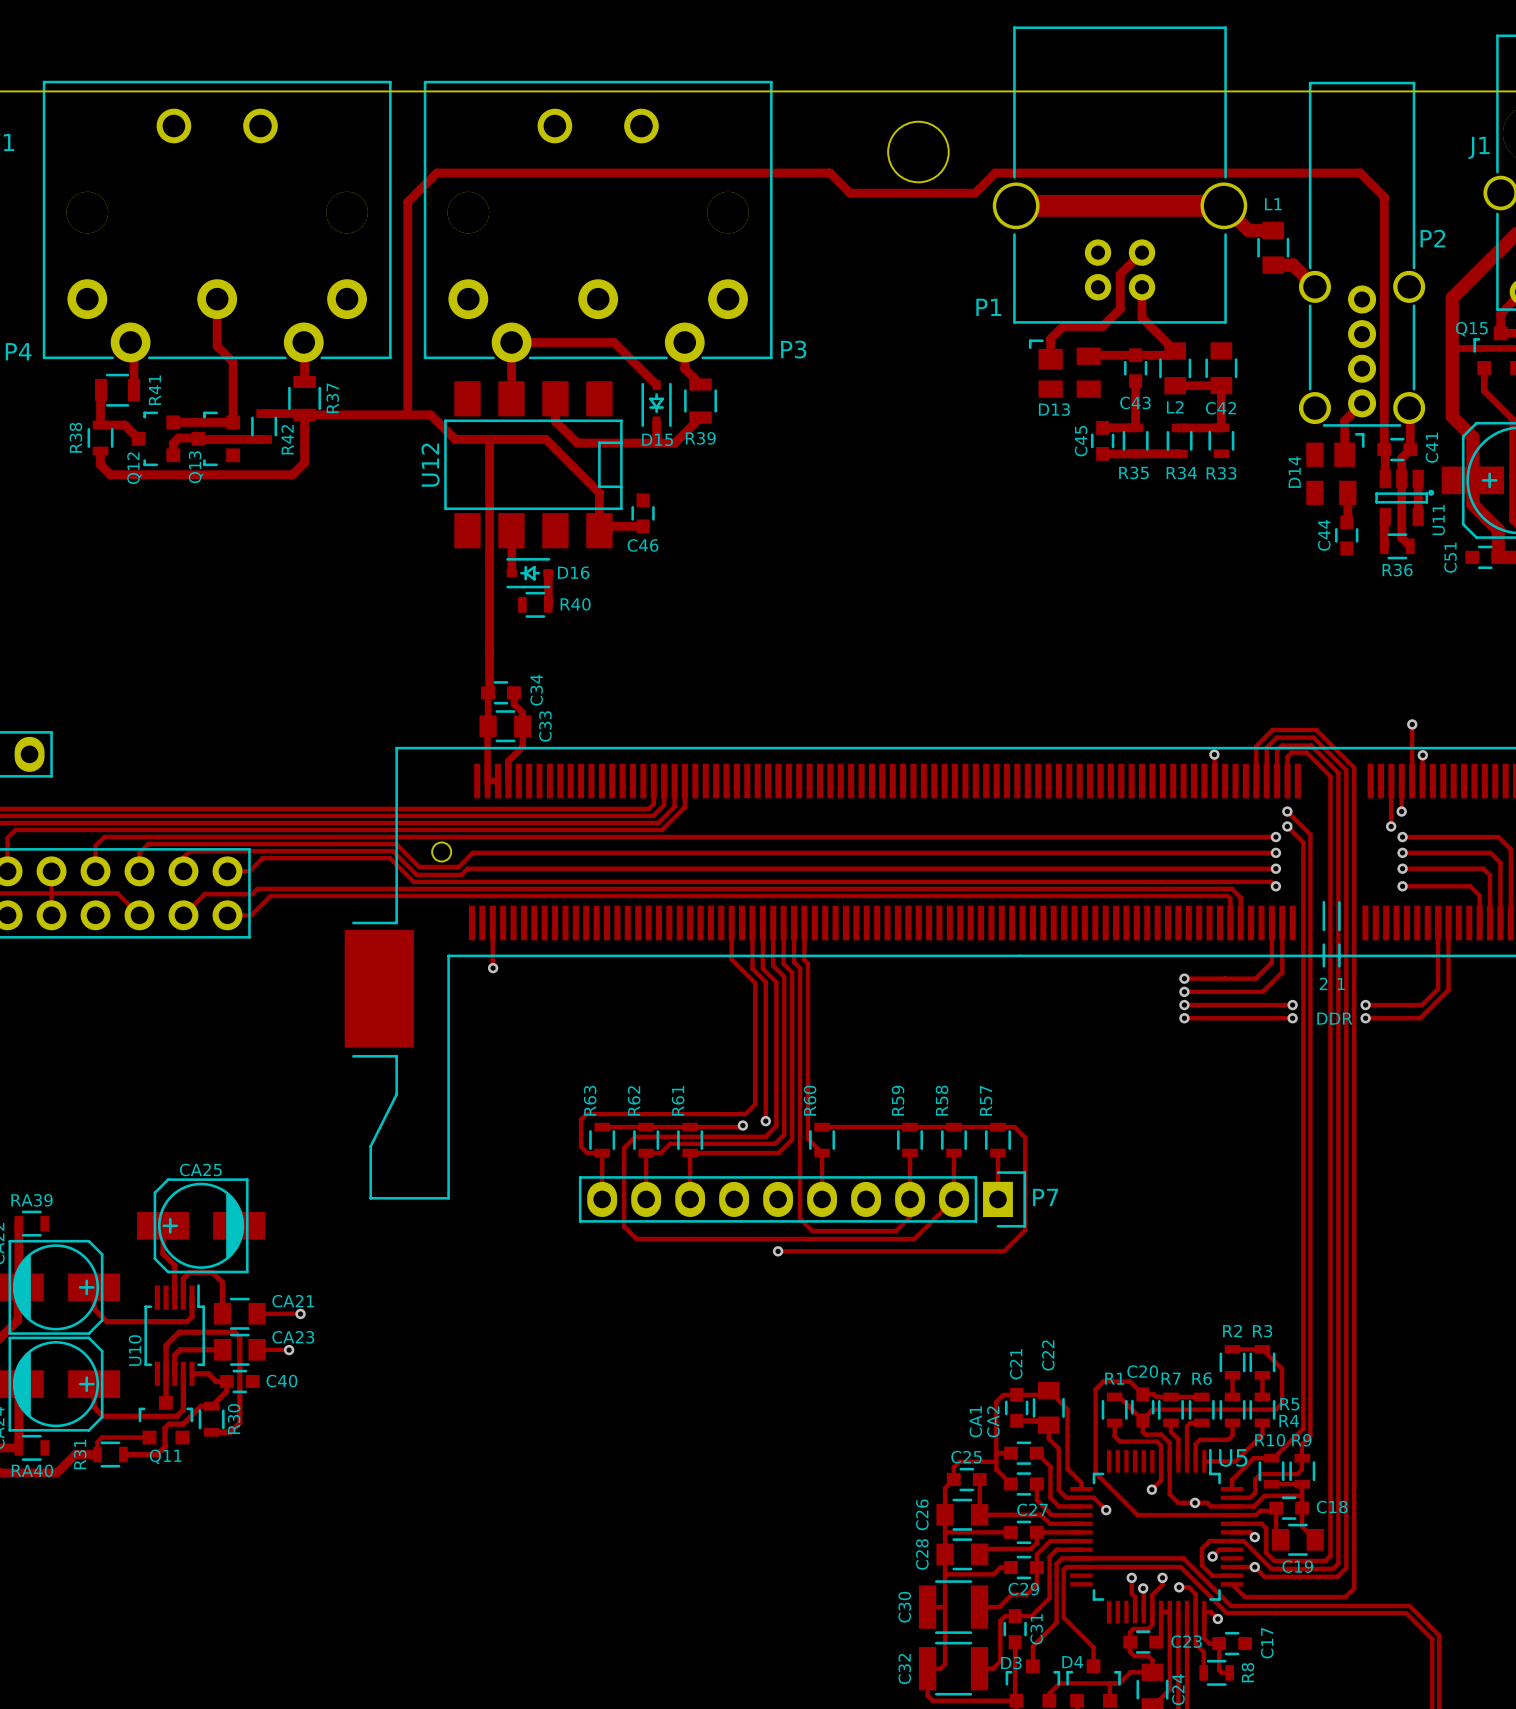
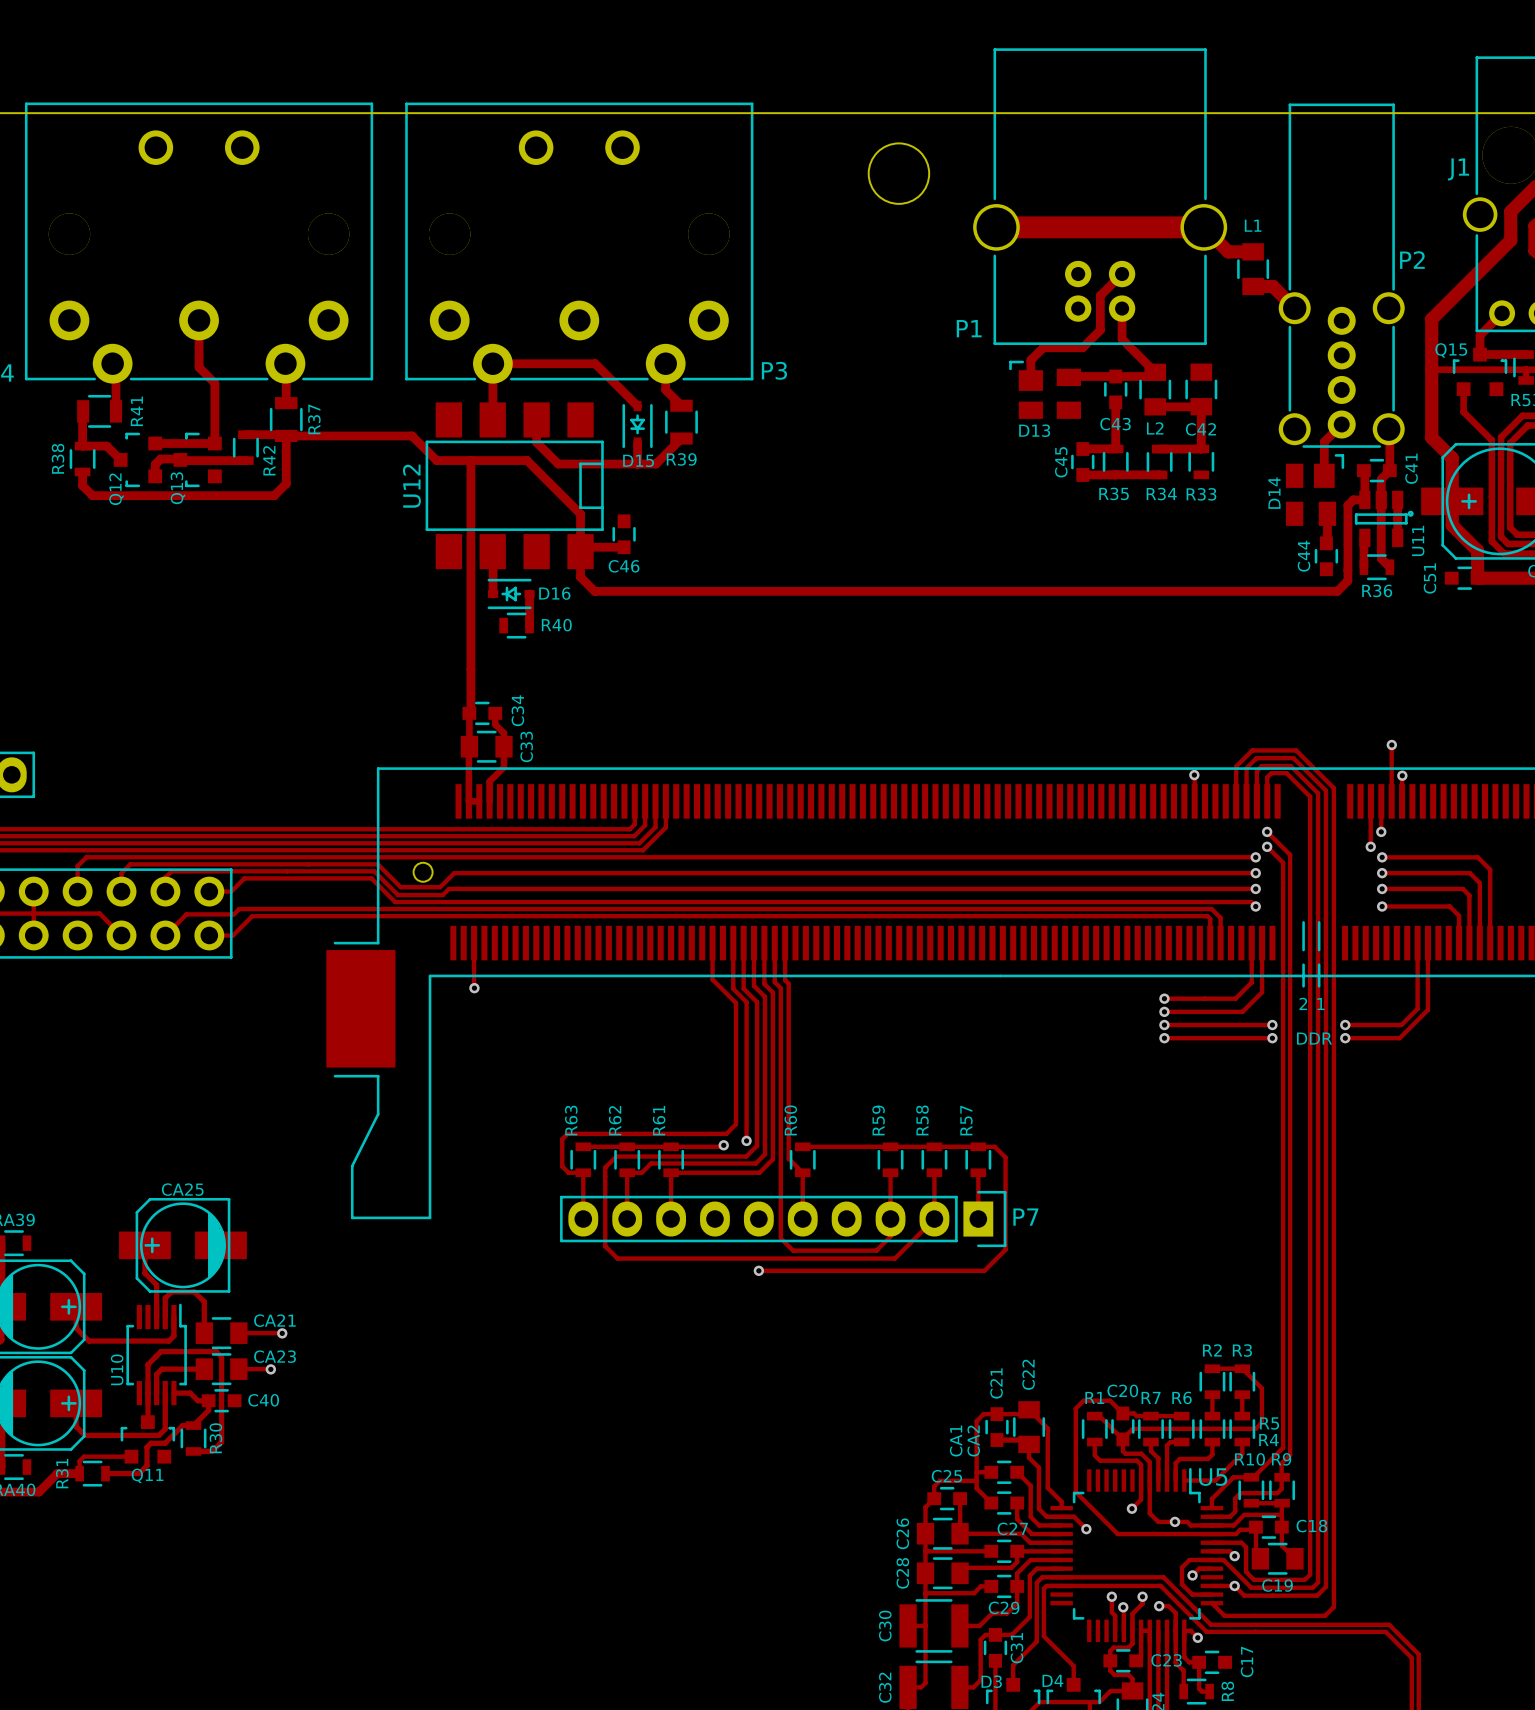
track: (407, 414) (407, 201) (436, 172) (829, 172) (850, 193) (975, 193) (995, 172) (1360, 172) (1384, 196) (1384, 449) -> none
track: none -> (1364, 499) (1353, 499) (1347, 505) (1347, 580) (1337, 591) (594, 591) (580, 577) (580, 551)

